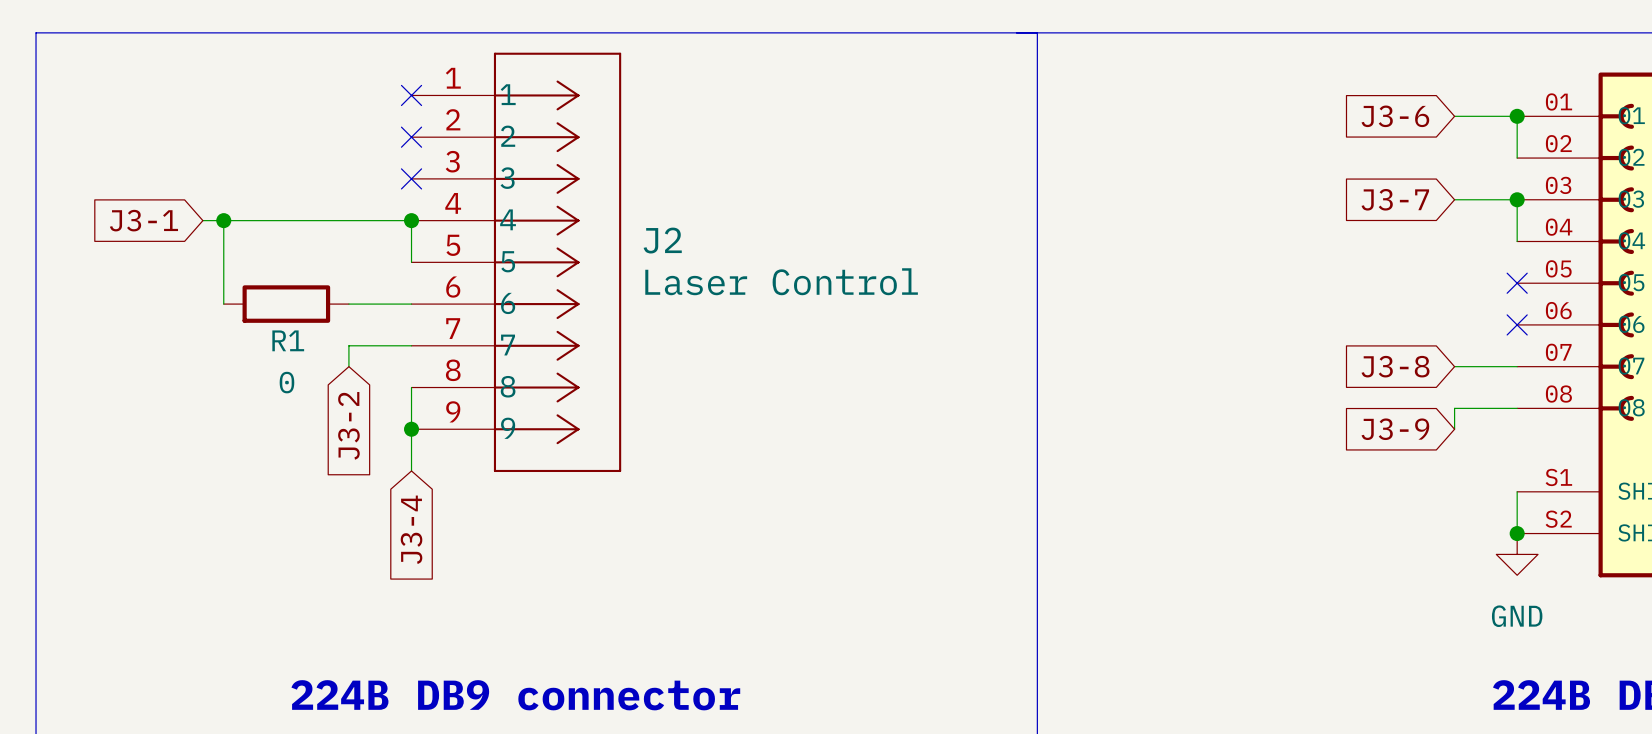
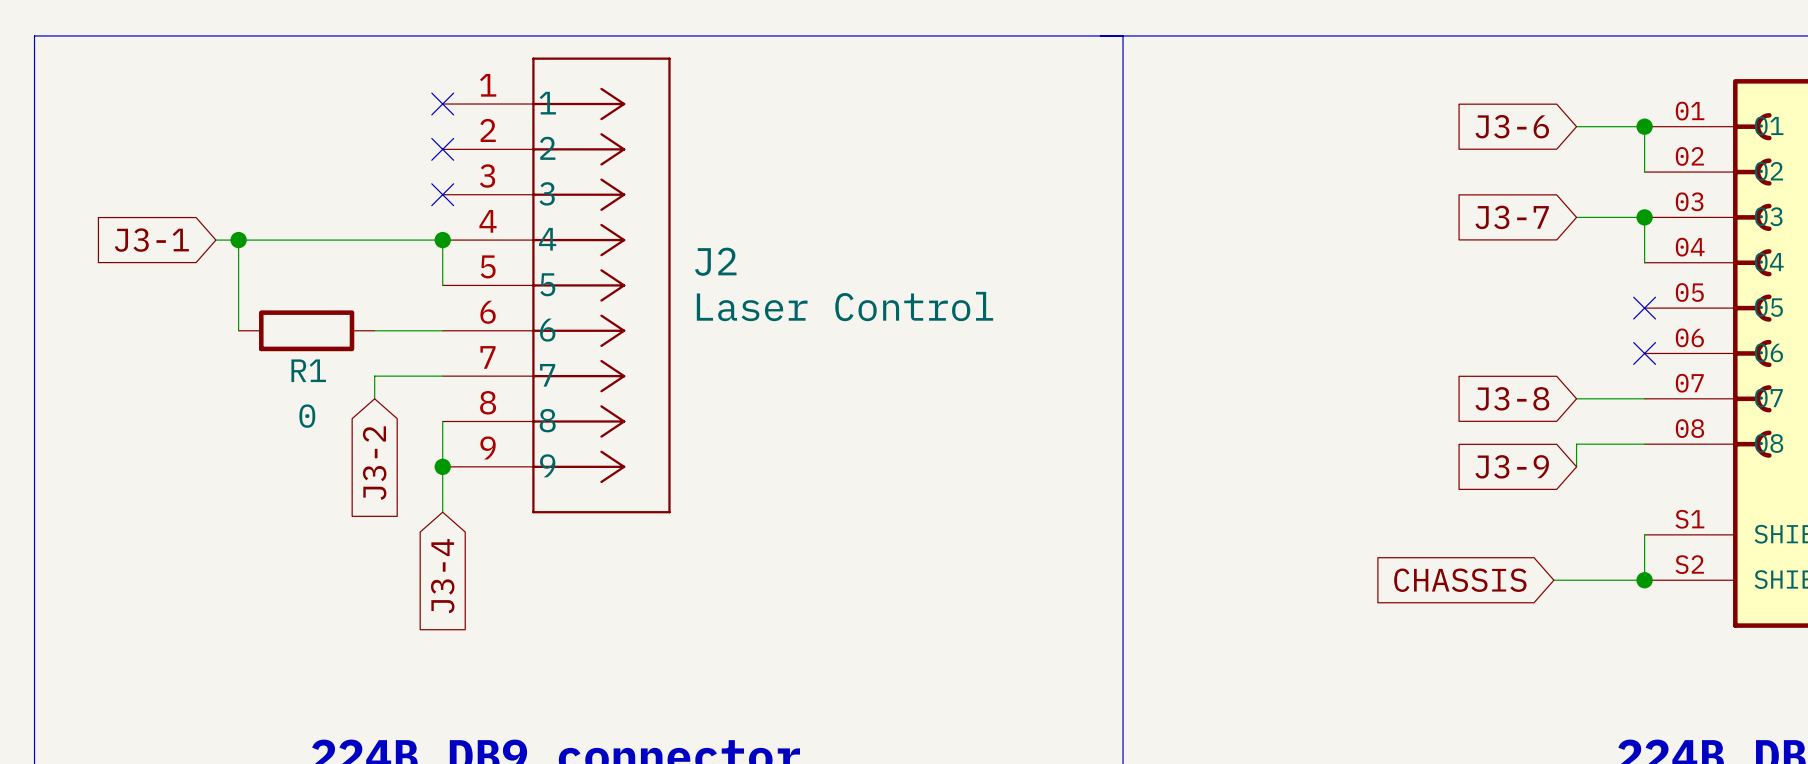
global label: none -> CHASSIS (1460, 580)
wire: none -> (1553, 580) (1644, 580)
power symbol: GND (1517, 554) -> none

